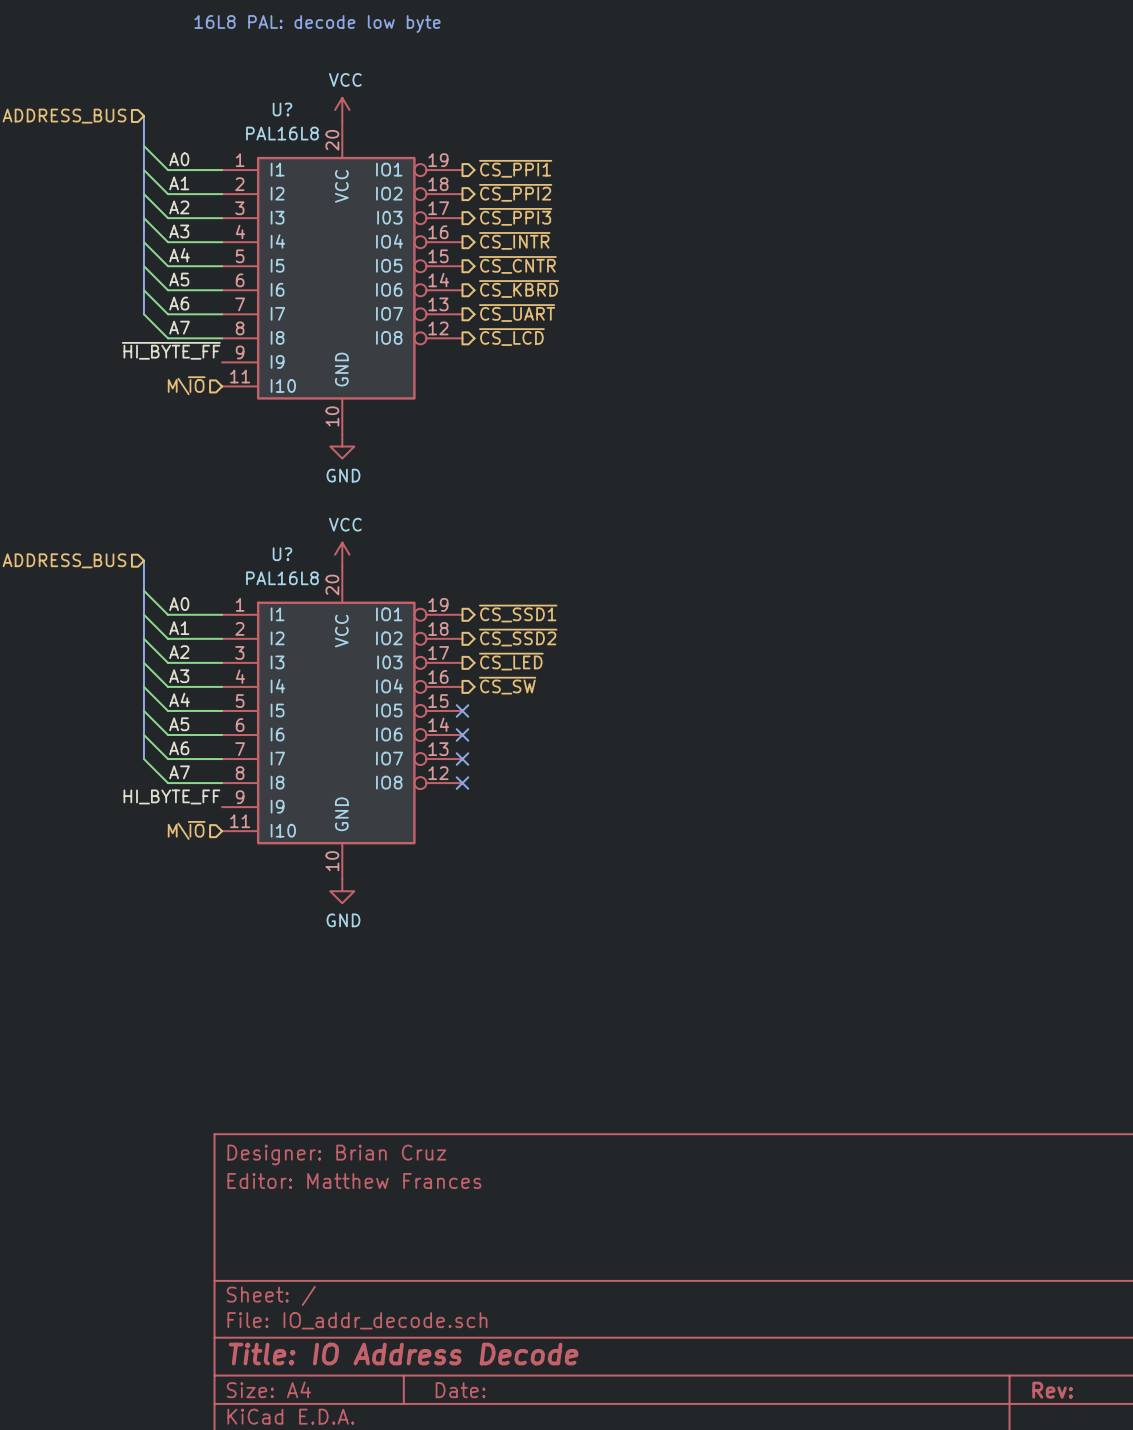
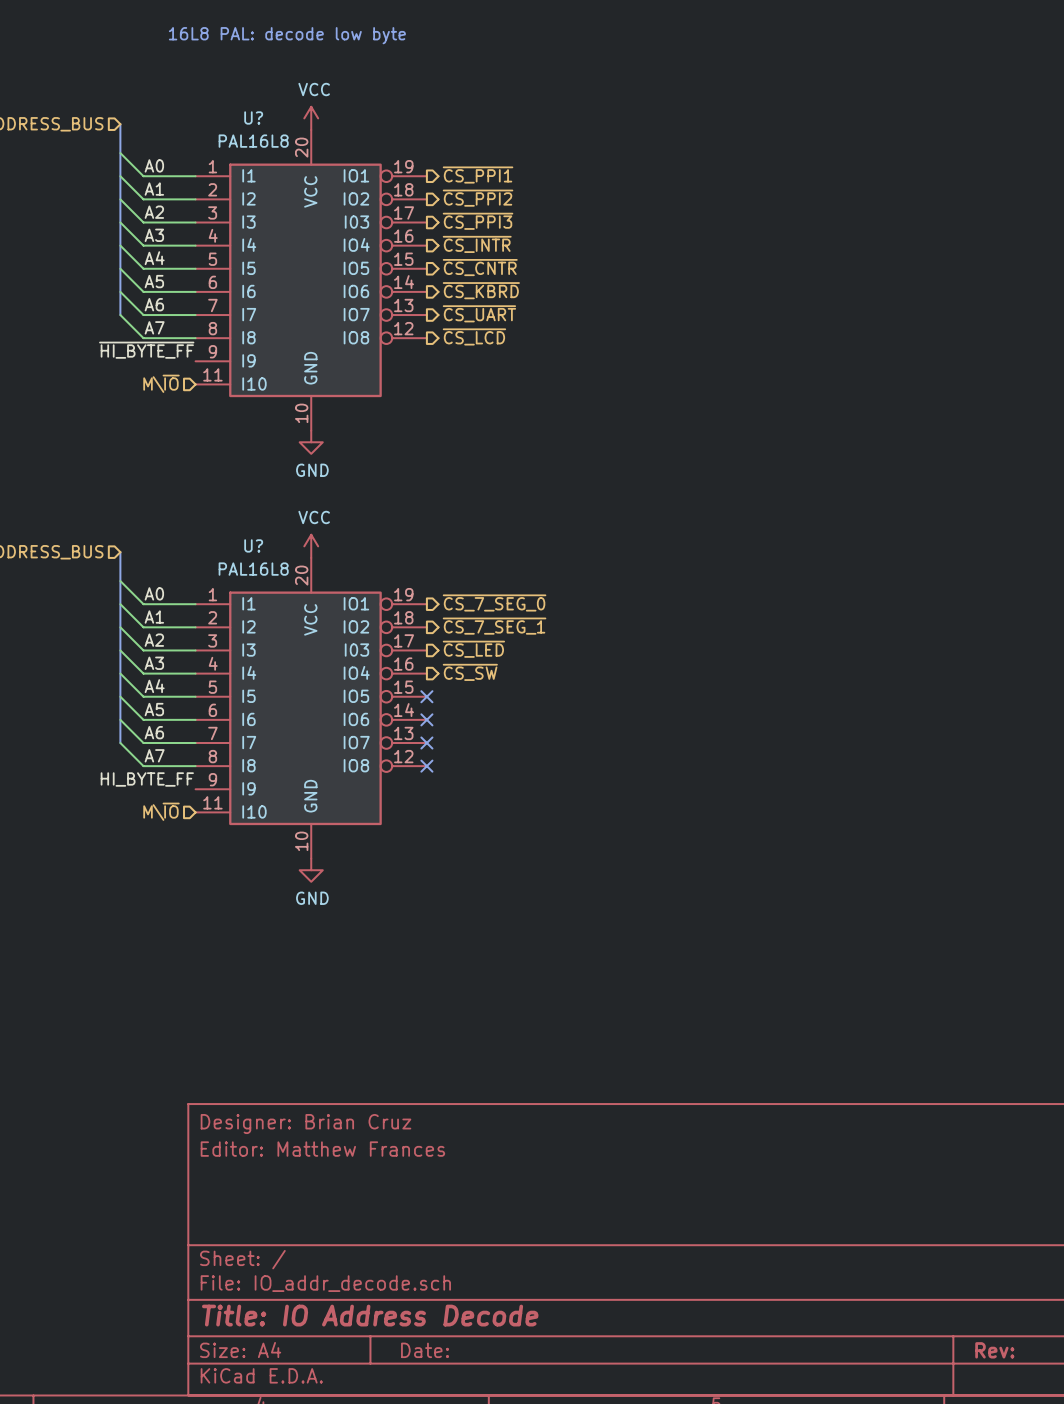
hierarchical label: ~{CS_SSD1} (518, 613) -> ~{CS_7_SEG_0} (494, 602)
hierarchical label: ~{CS_SSD2} (518, 637) -> ~{CS_7_SEG_1} (494, 626)

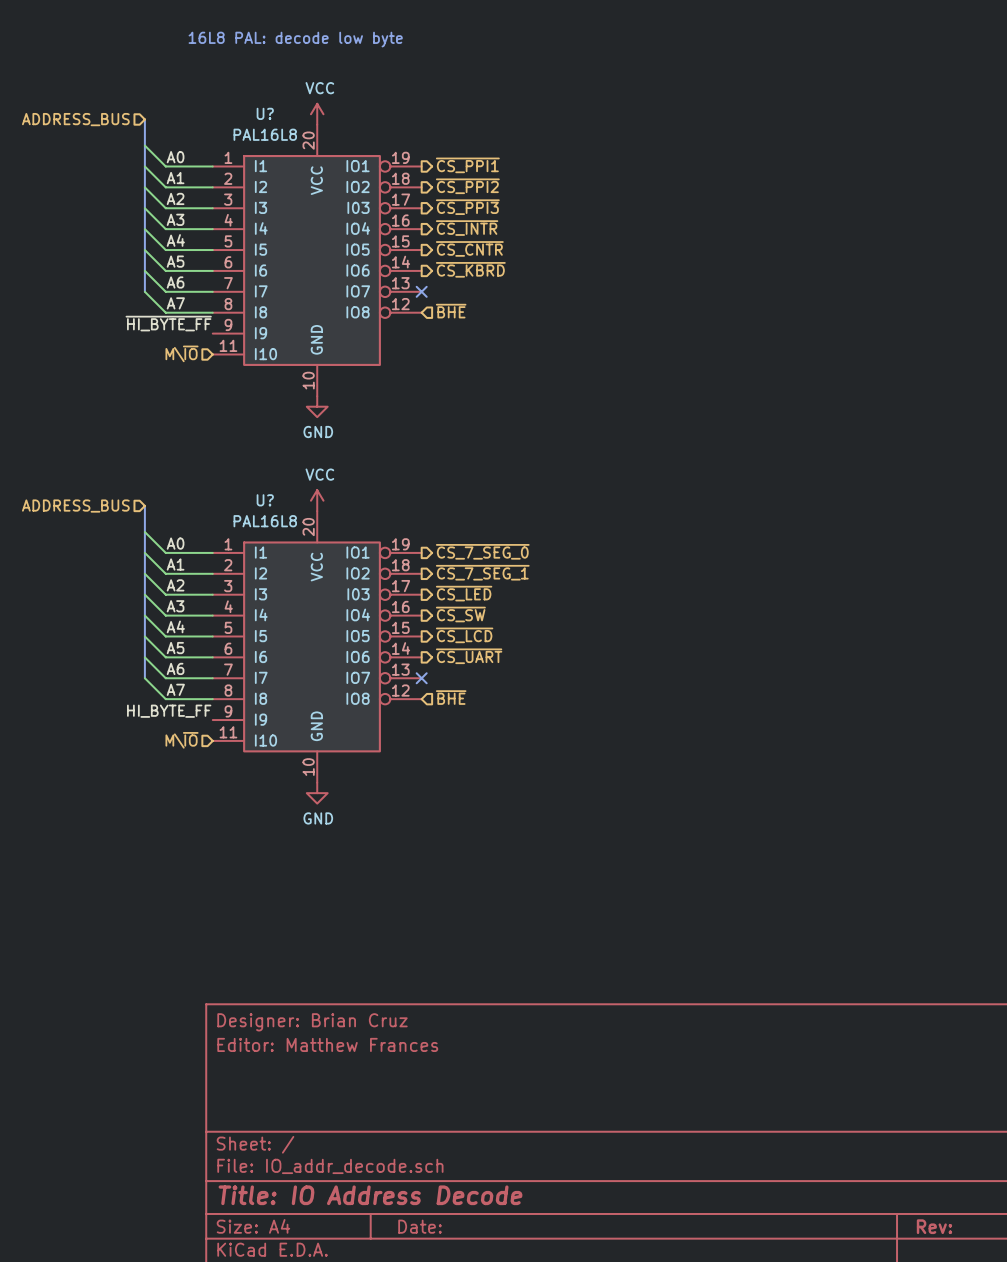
hierarchical label: ~{CS_UART} (479, 313) -> none
no-connect mark: none -> (421, 291)
hierarchical label shape: output (474, 336) -> input (451, 311)
hierarchical label: ~{CS_LCD} (474, 336) -> ~{BHE} (451, 311)
hierarchical label: none -> ~{CS_LCD} (464, 635)
no-connect mark: (426, 696) -> none
hierarchical label: none -> ~{CS_UART} (469, 656)
no-connect mark: (426, 719) -> none
hierarchical label: none -> ~{BHE} (451, 697)
no-connect mark: (426, 766) -> none

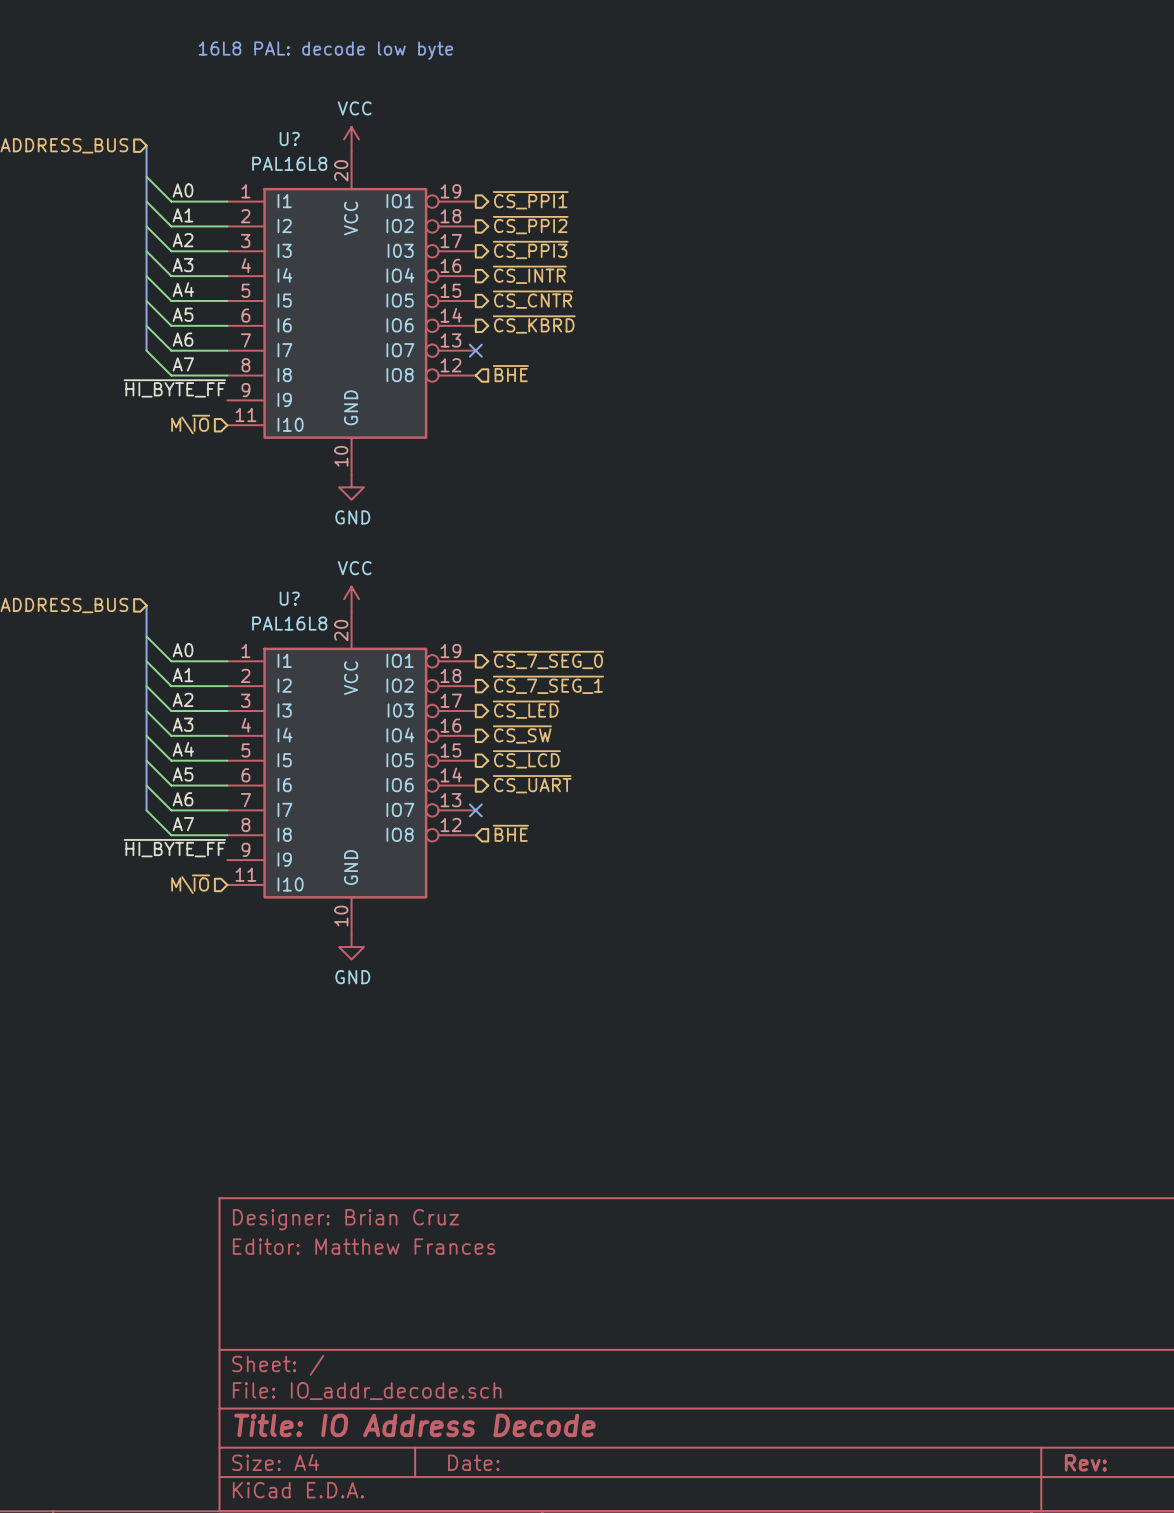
label: HI_BYTE_FF (169, 711) -> ~{HI_BYTE_FF} (174, 848)

